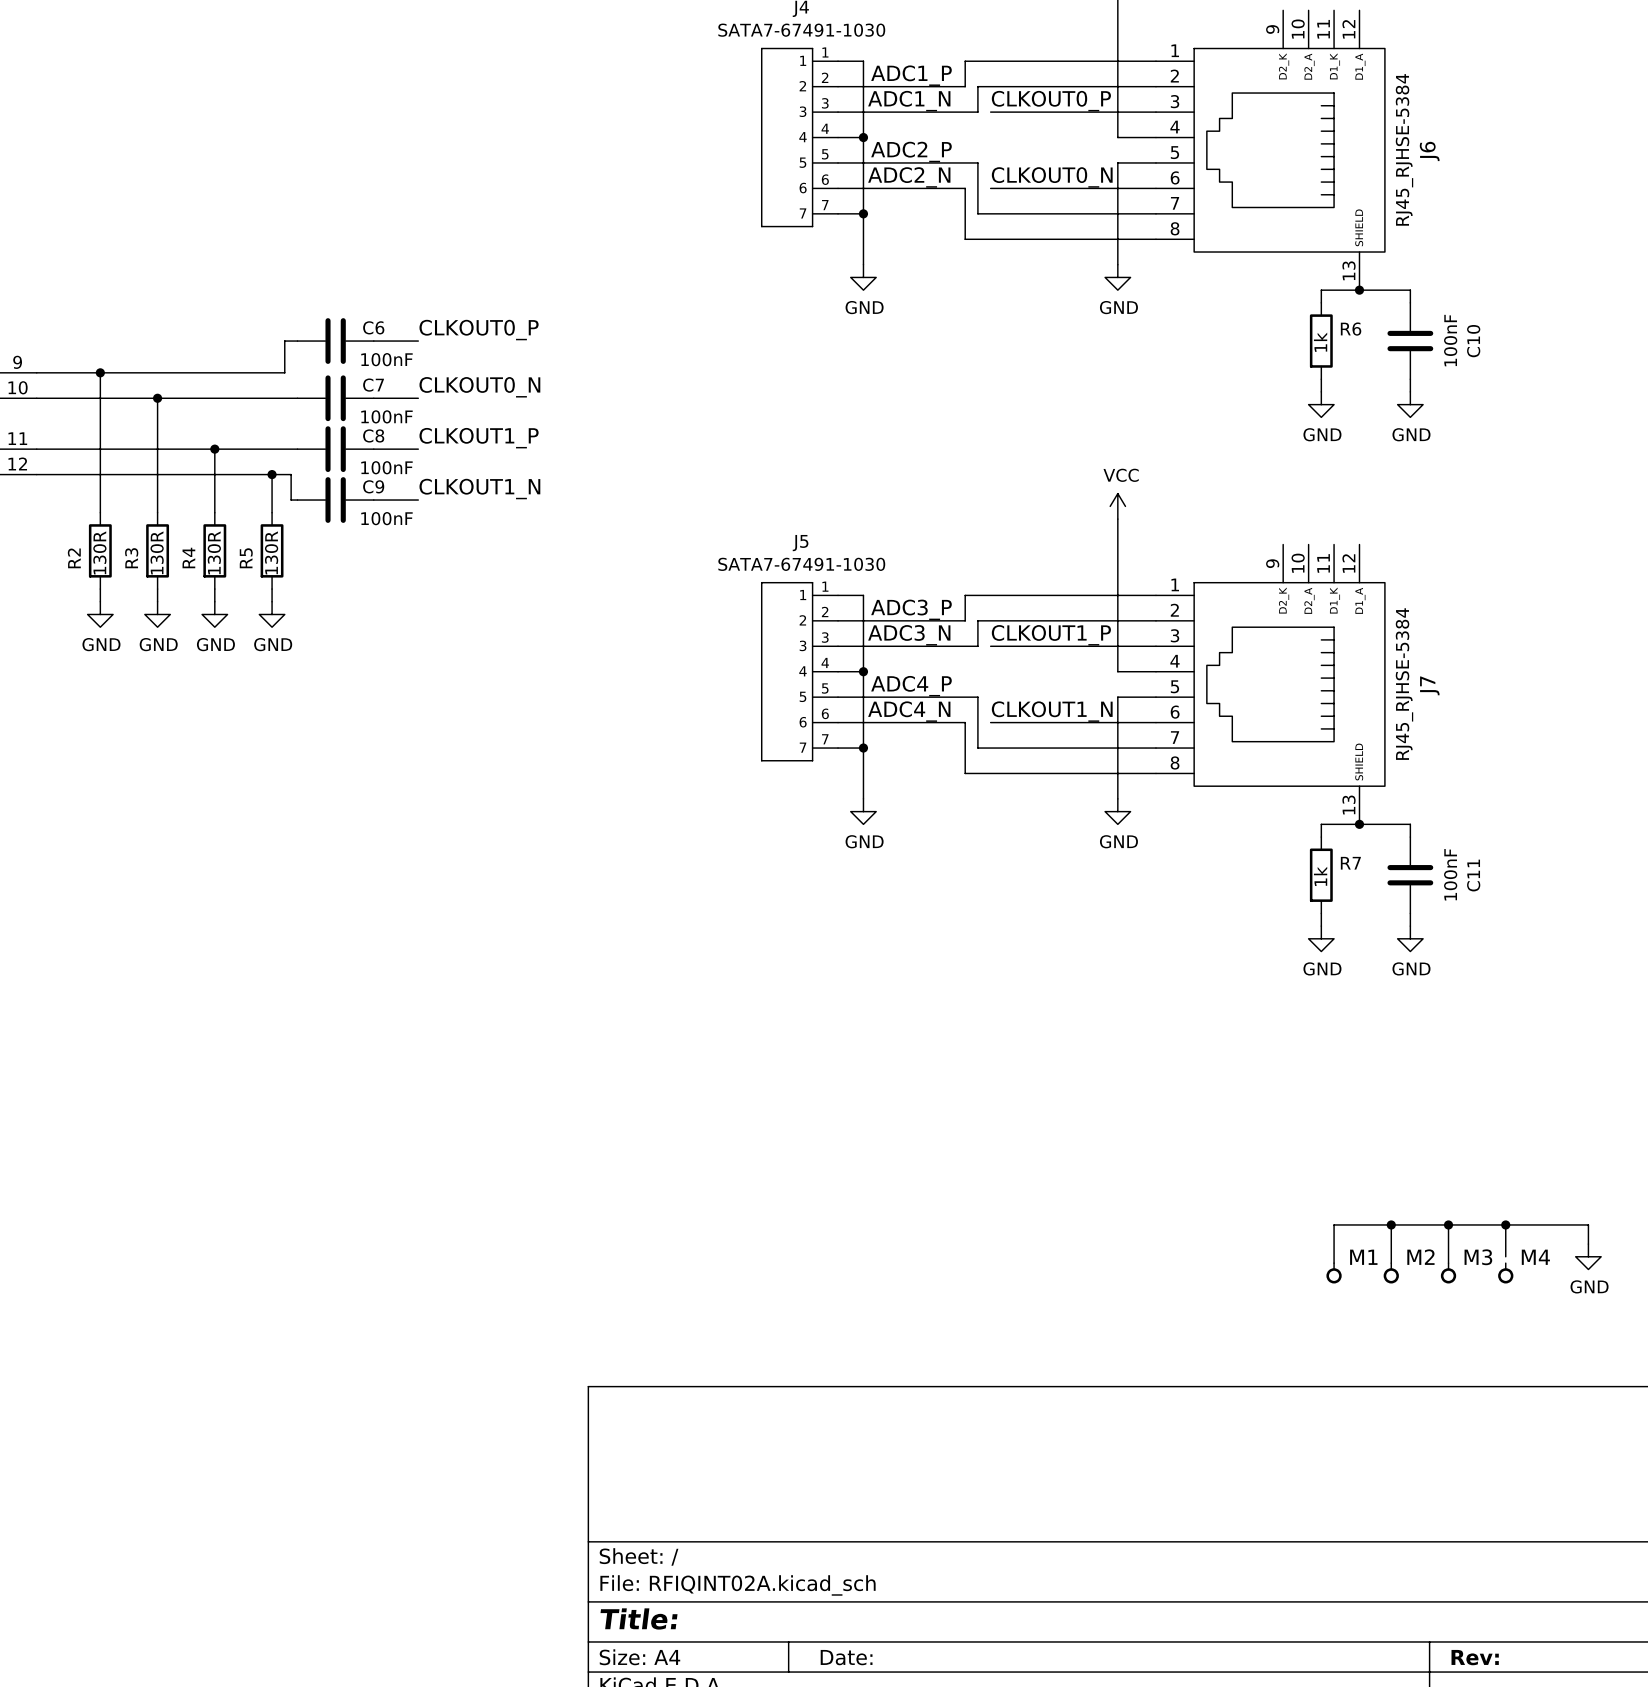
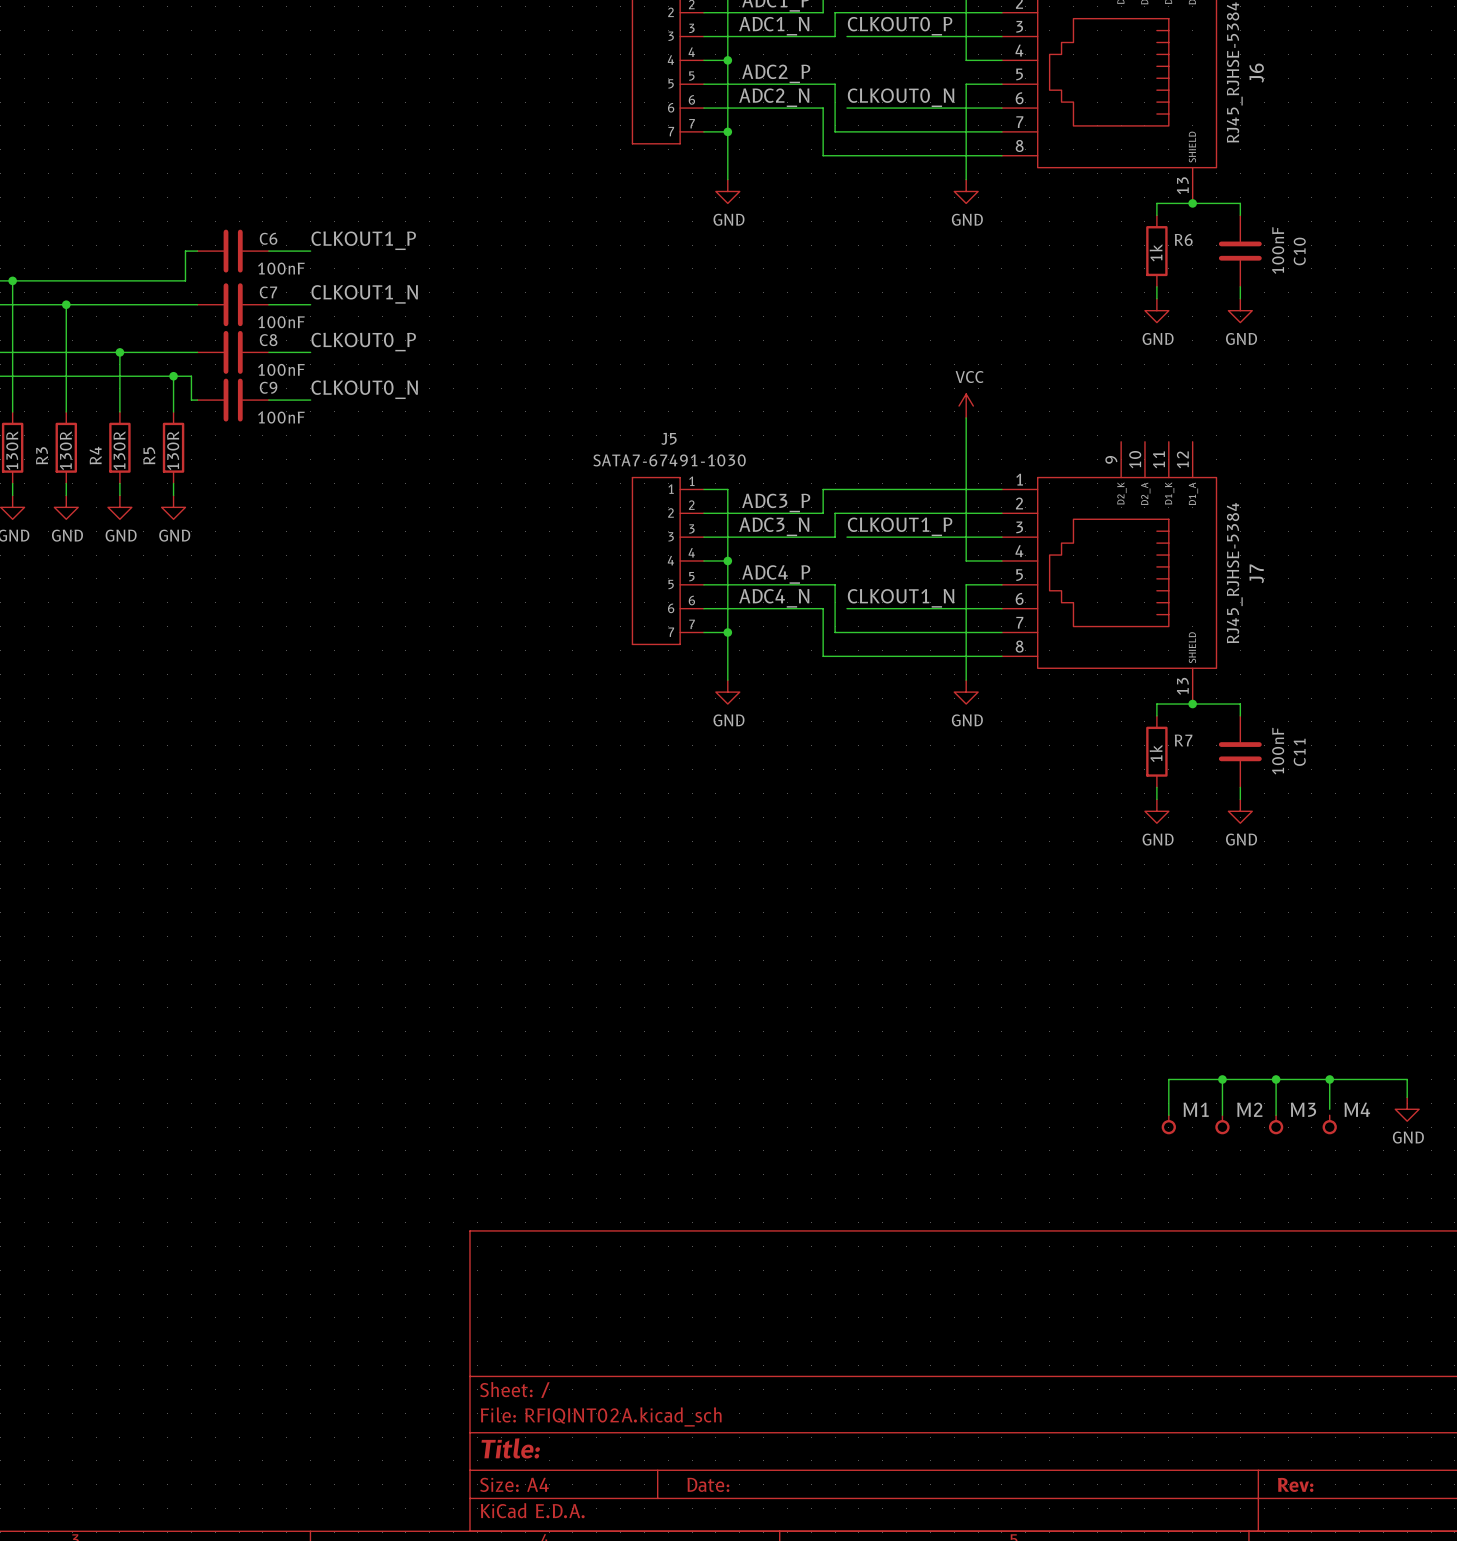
label: CLKOUT0_P (479, 330) -> CLKOUT1_P (363, 240)
label: CLKOUT0_N (479, 387) -> CLKOUT1_N (364, 294)
label: CLKOUT1_P (479, 438) -> CLKOUT0_P (363, 342)
label: CLKOUT1_N (479, 489) -> CLKOUT0_N (364, 389)

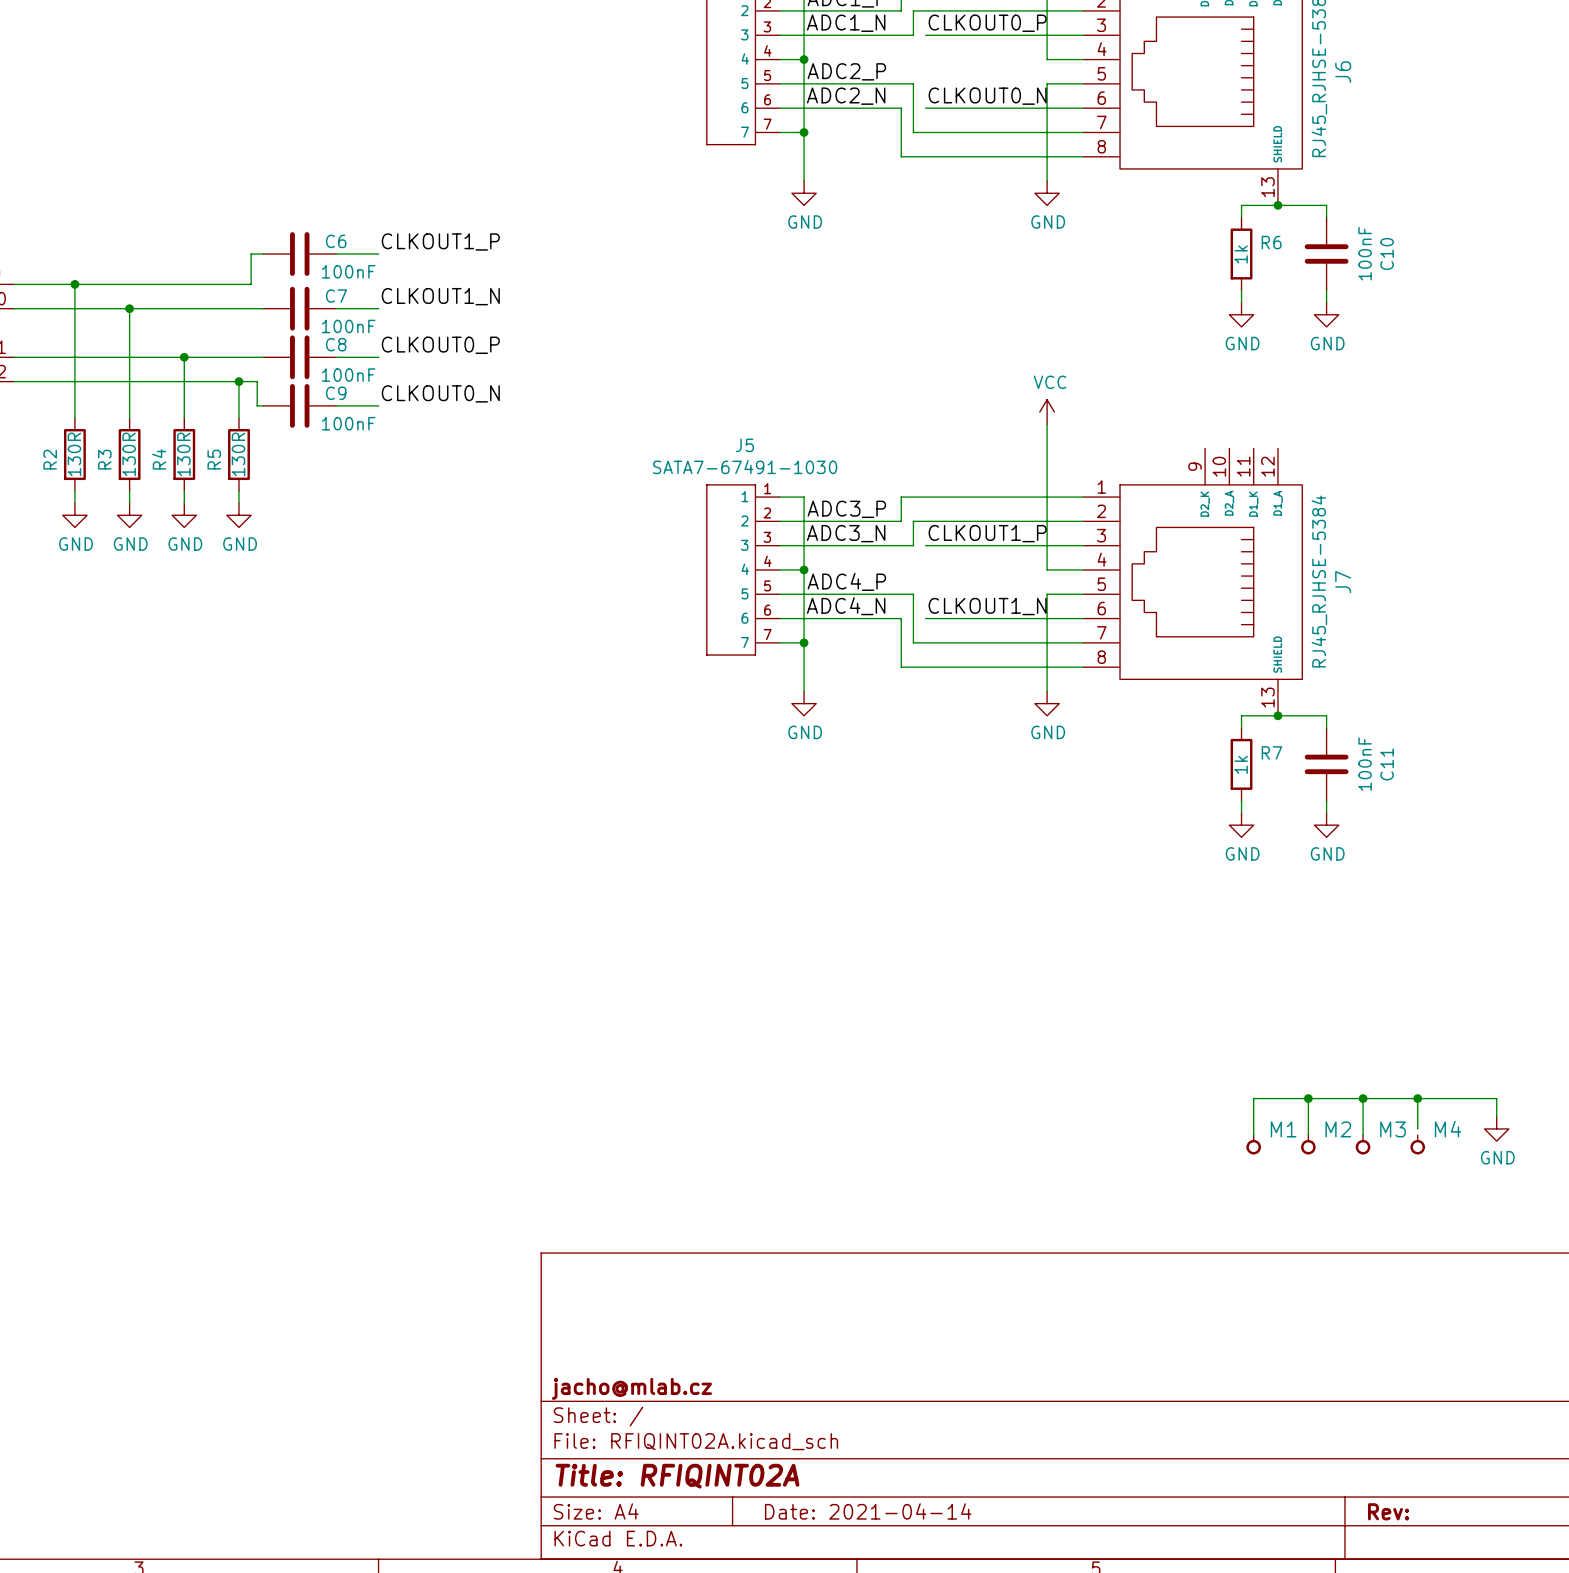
title block: none -> jacho@mlab.cz (631, 1388)
title block: Title: (510, 1448) -> Title: RFIQINT02A (677, 1476)
title block: Date: (708, 1484) -> Date: 2021-04-14 (868, 1511)

